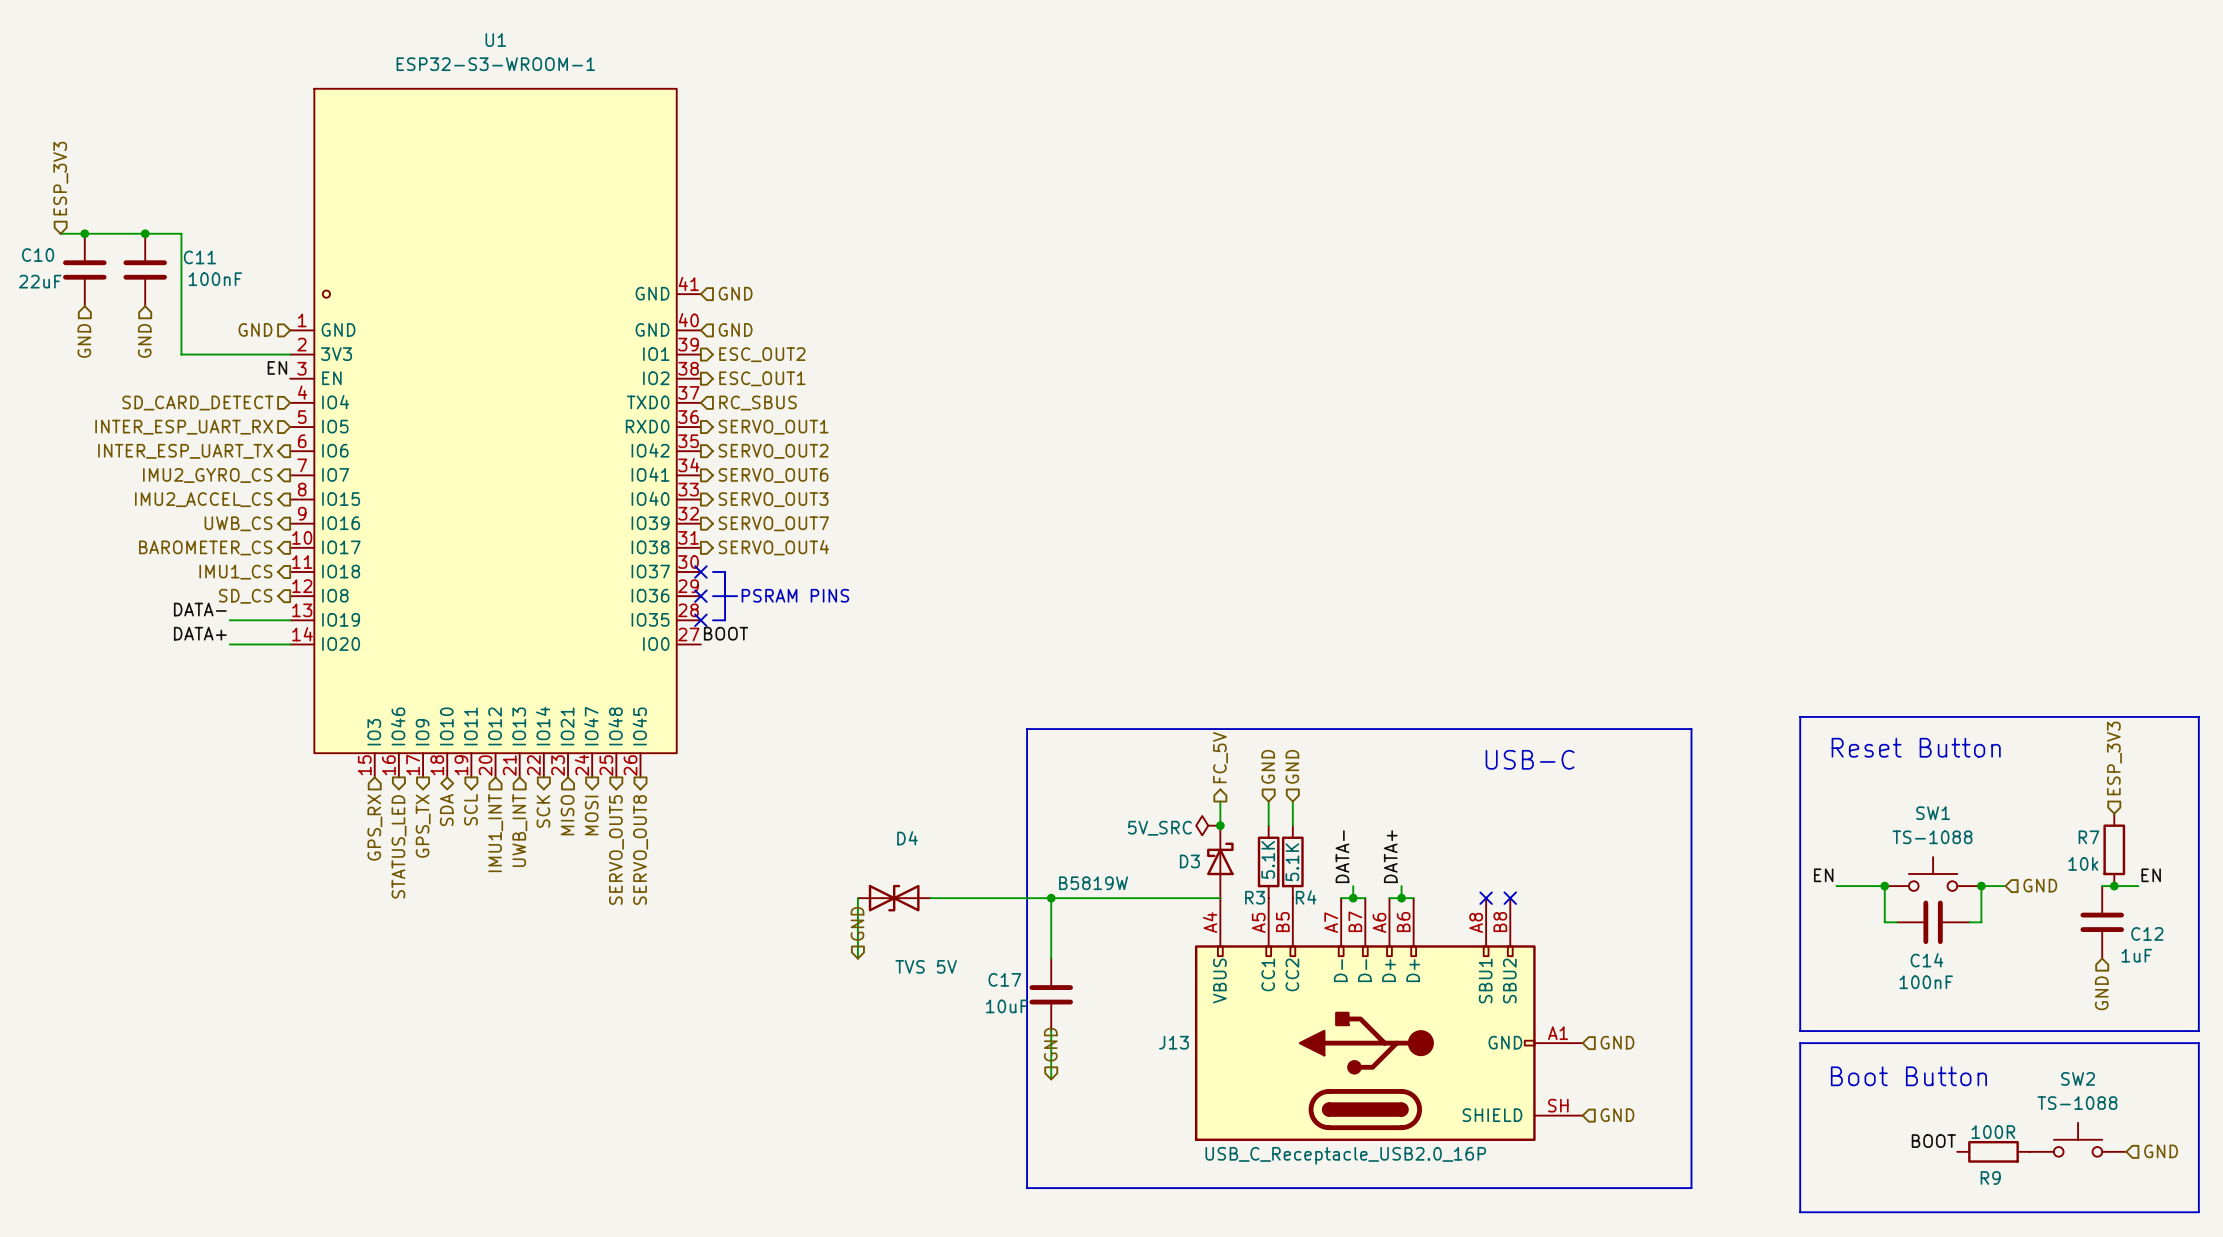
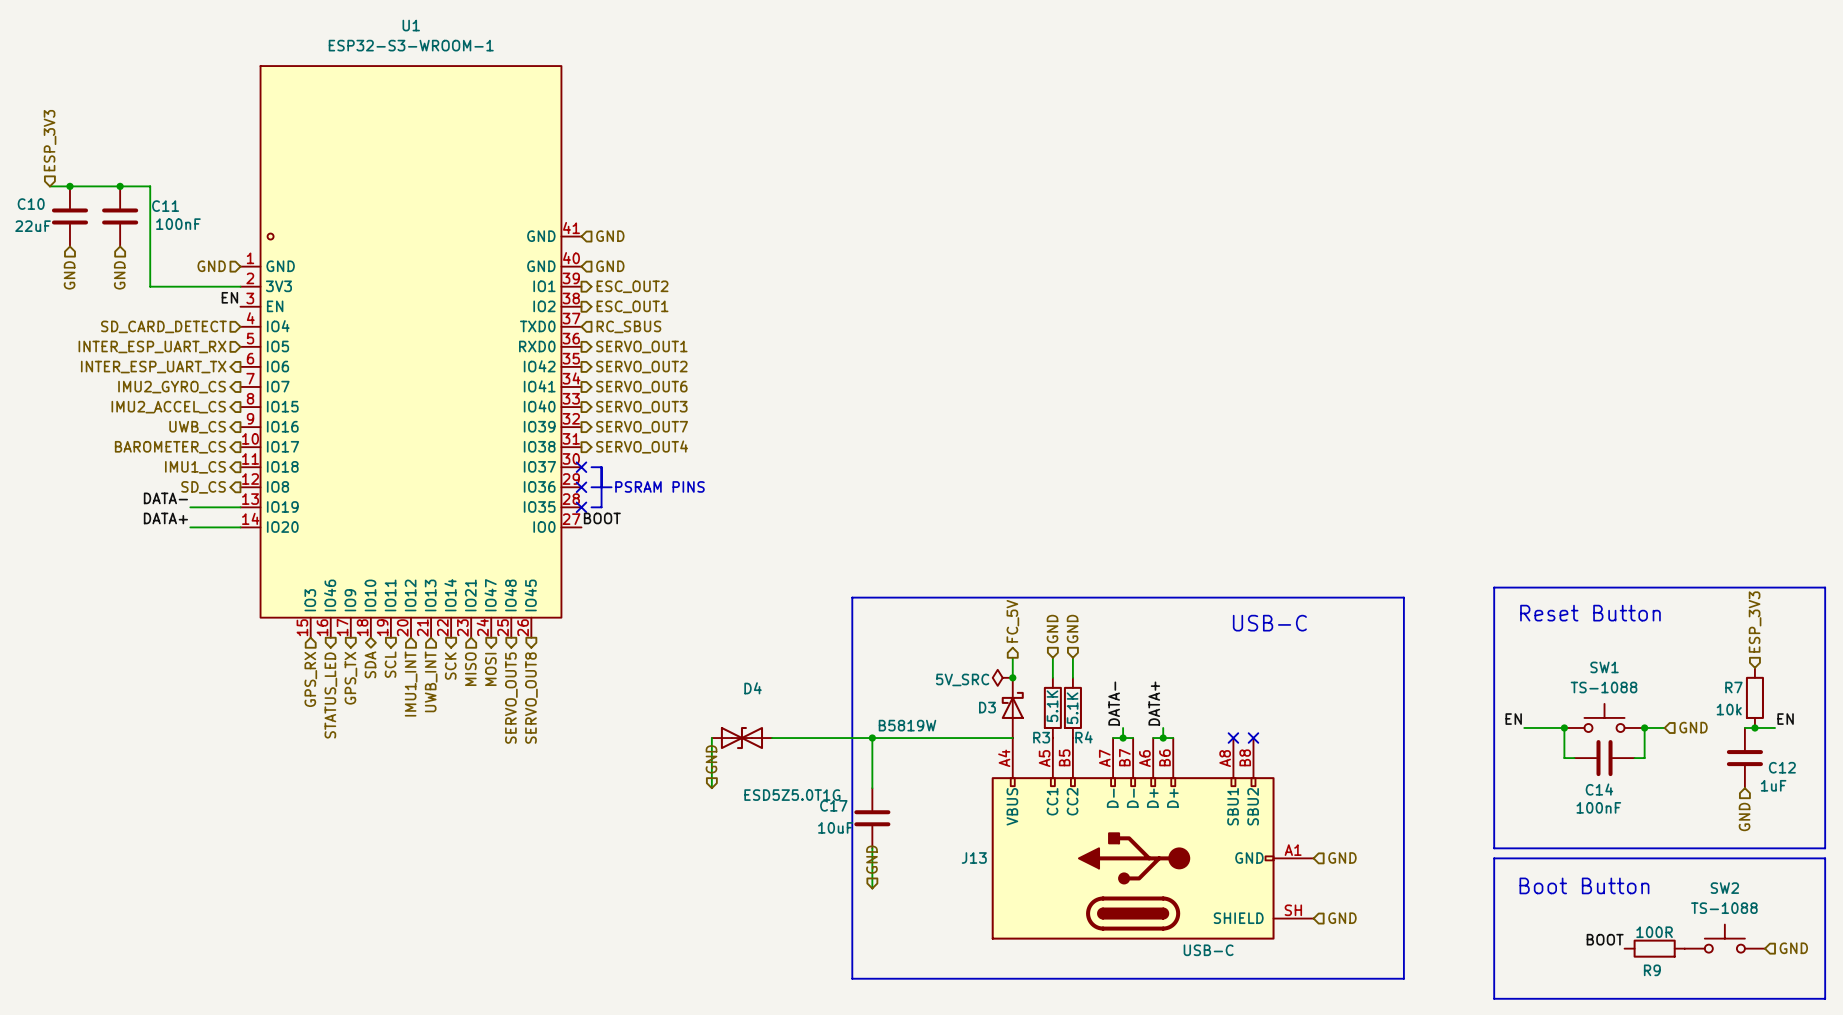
D4 value: TVS 5V (926, 966) -> ESD5Z5.0T1G (792, 795)
J13 value: USB_C_Receptacle_USB2.0_16P (1345, 1155) -> USB-C (1208, 950)

